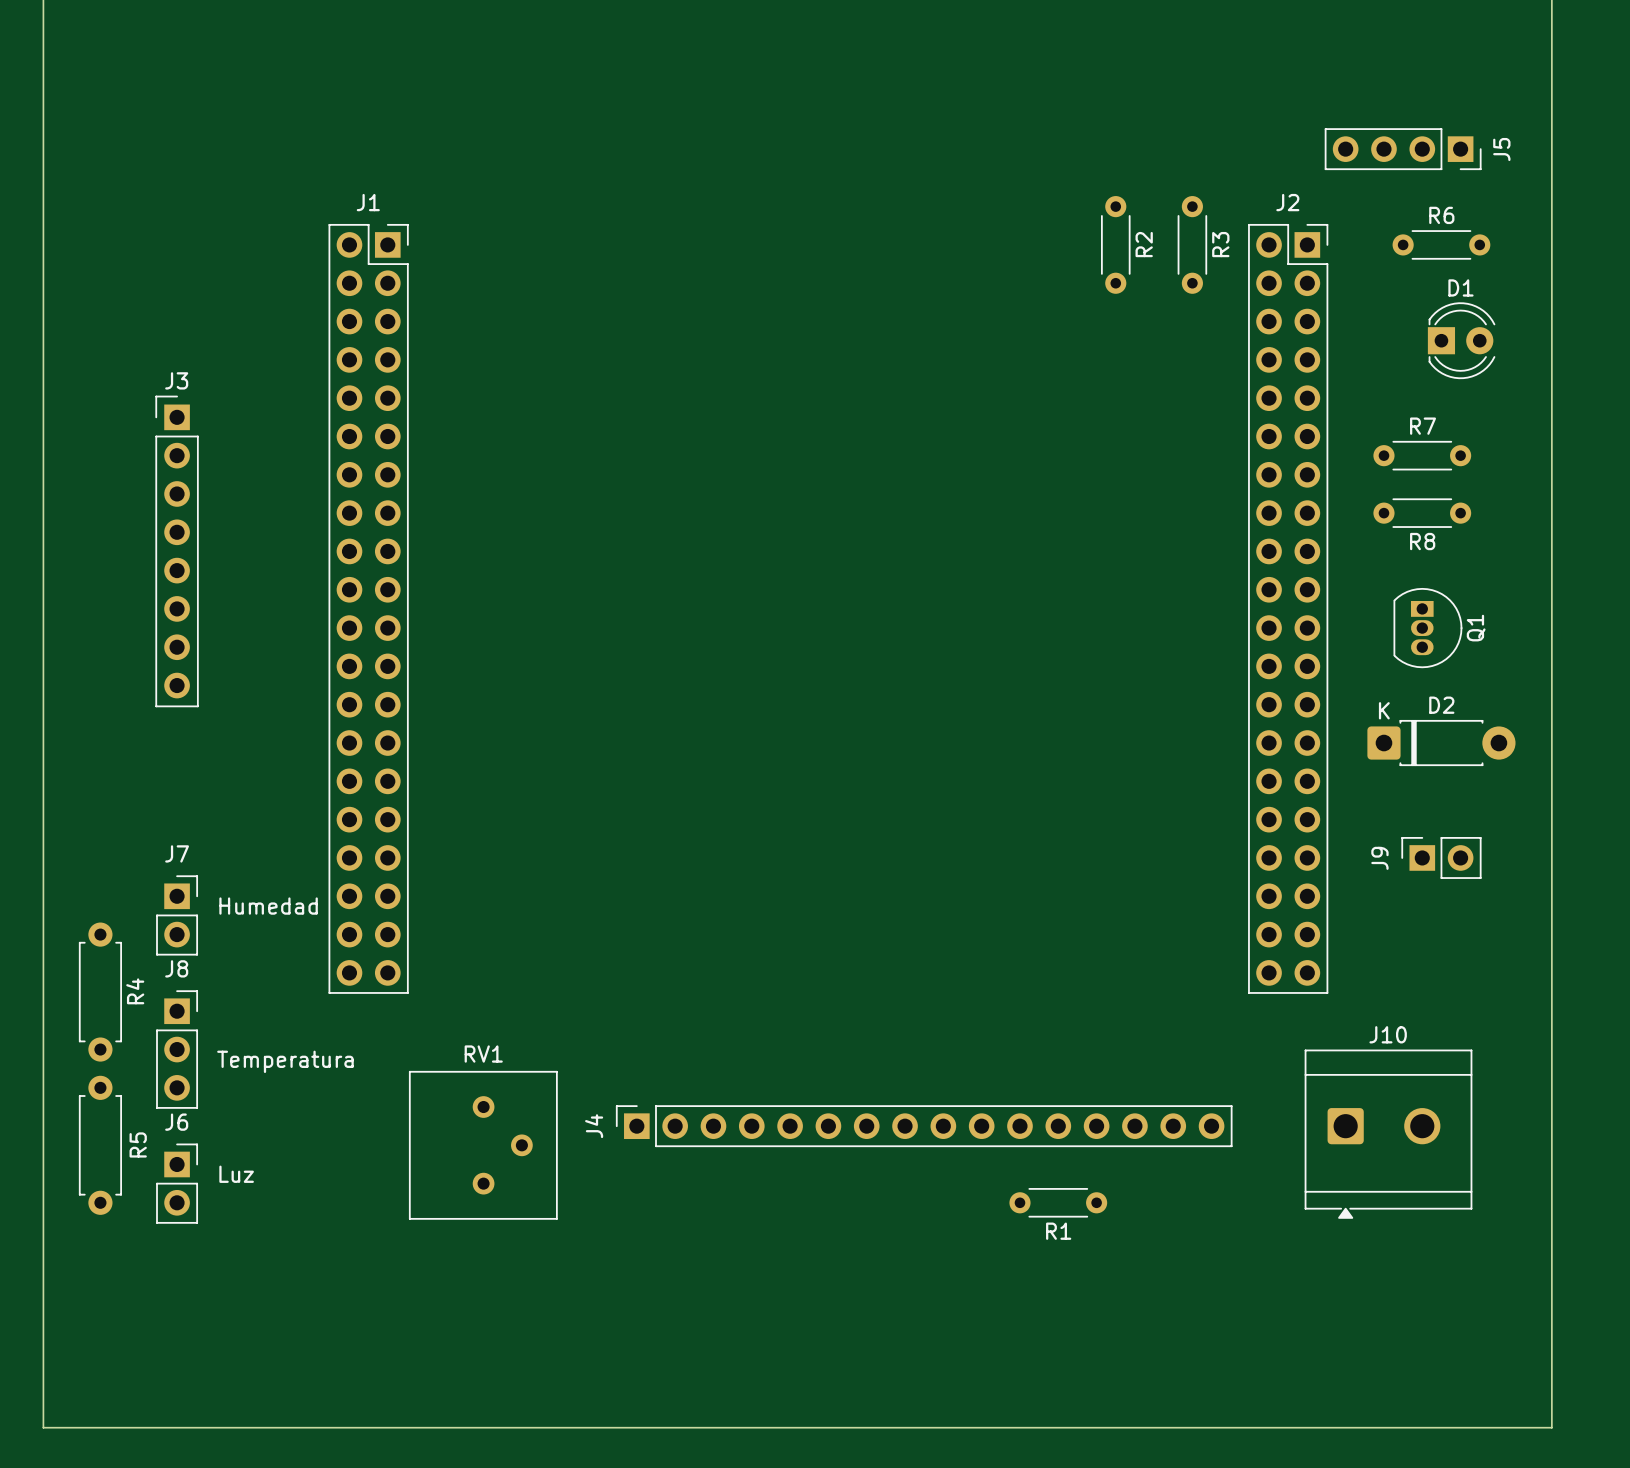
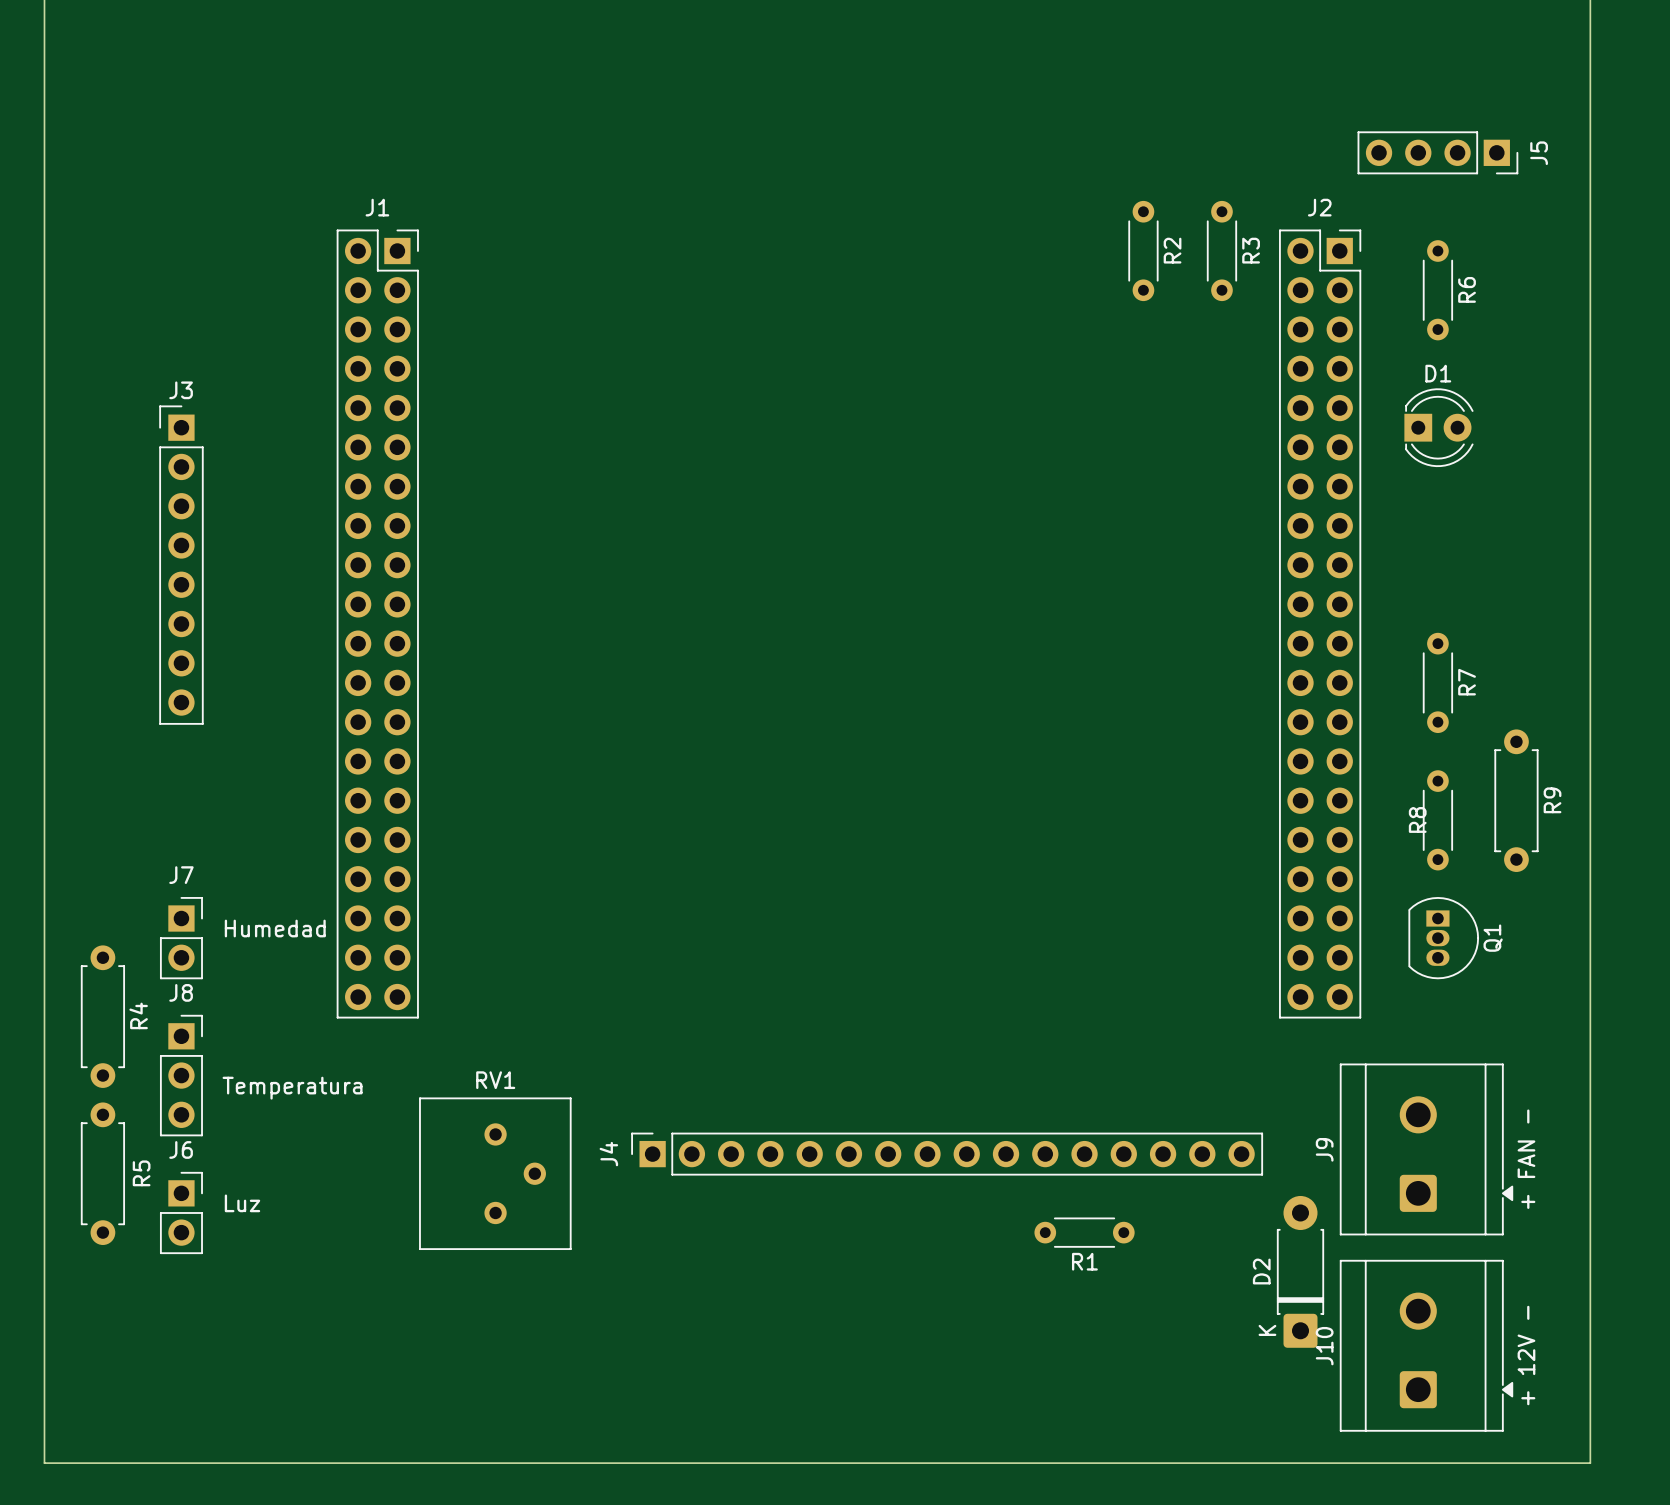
R6 rotation: 0° (1441, 244) -> 90° clockwise (1437, 290)
D1 position: (1461, 340) -> (1438, 427)
R7 rotation: 0° (1422, 455) -> 90° clockwise (1437, 682)
R7 position: (1422, 455) -> (1437, 682)
R8 rotation: 0° (1422, 513) -> 90° clockwise (1437, 820)
R8 position: (1422, 513) -> (1437, 820)
Q1 position: (1427, 628) -> (1443, 938)
D2 rotation: 0° (1441, 743) -> 90° counterclockwise (1300, 1271)
D2 position: (1441, 743) -> (1300, 1271)
R9: none -> (1516, 800)
J9 footprint: [1401, 837, 1482, 879] -> [1339, 1063, 1514, 1236]
J9 name position: J9 (1379, 858) -> J9 (1324, 1149)
text: none -> + FAN - (1526, 1159)
J10 rotation: 0° (1388, 1134) -> 90° counterclockwise (1426, 1345)
J10 position: (1388, 1134) -> (1426, 1345)
text: none -> + 12V - (1526, 1355)

